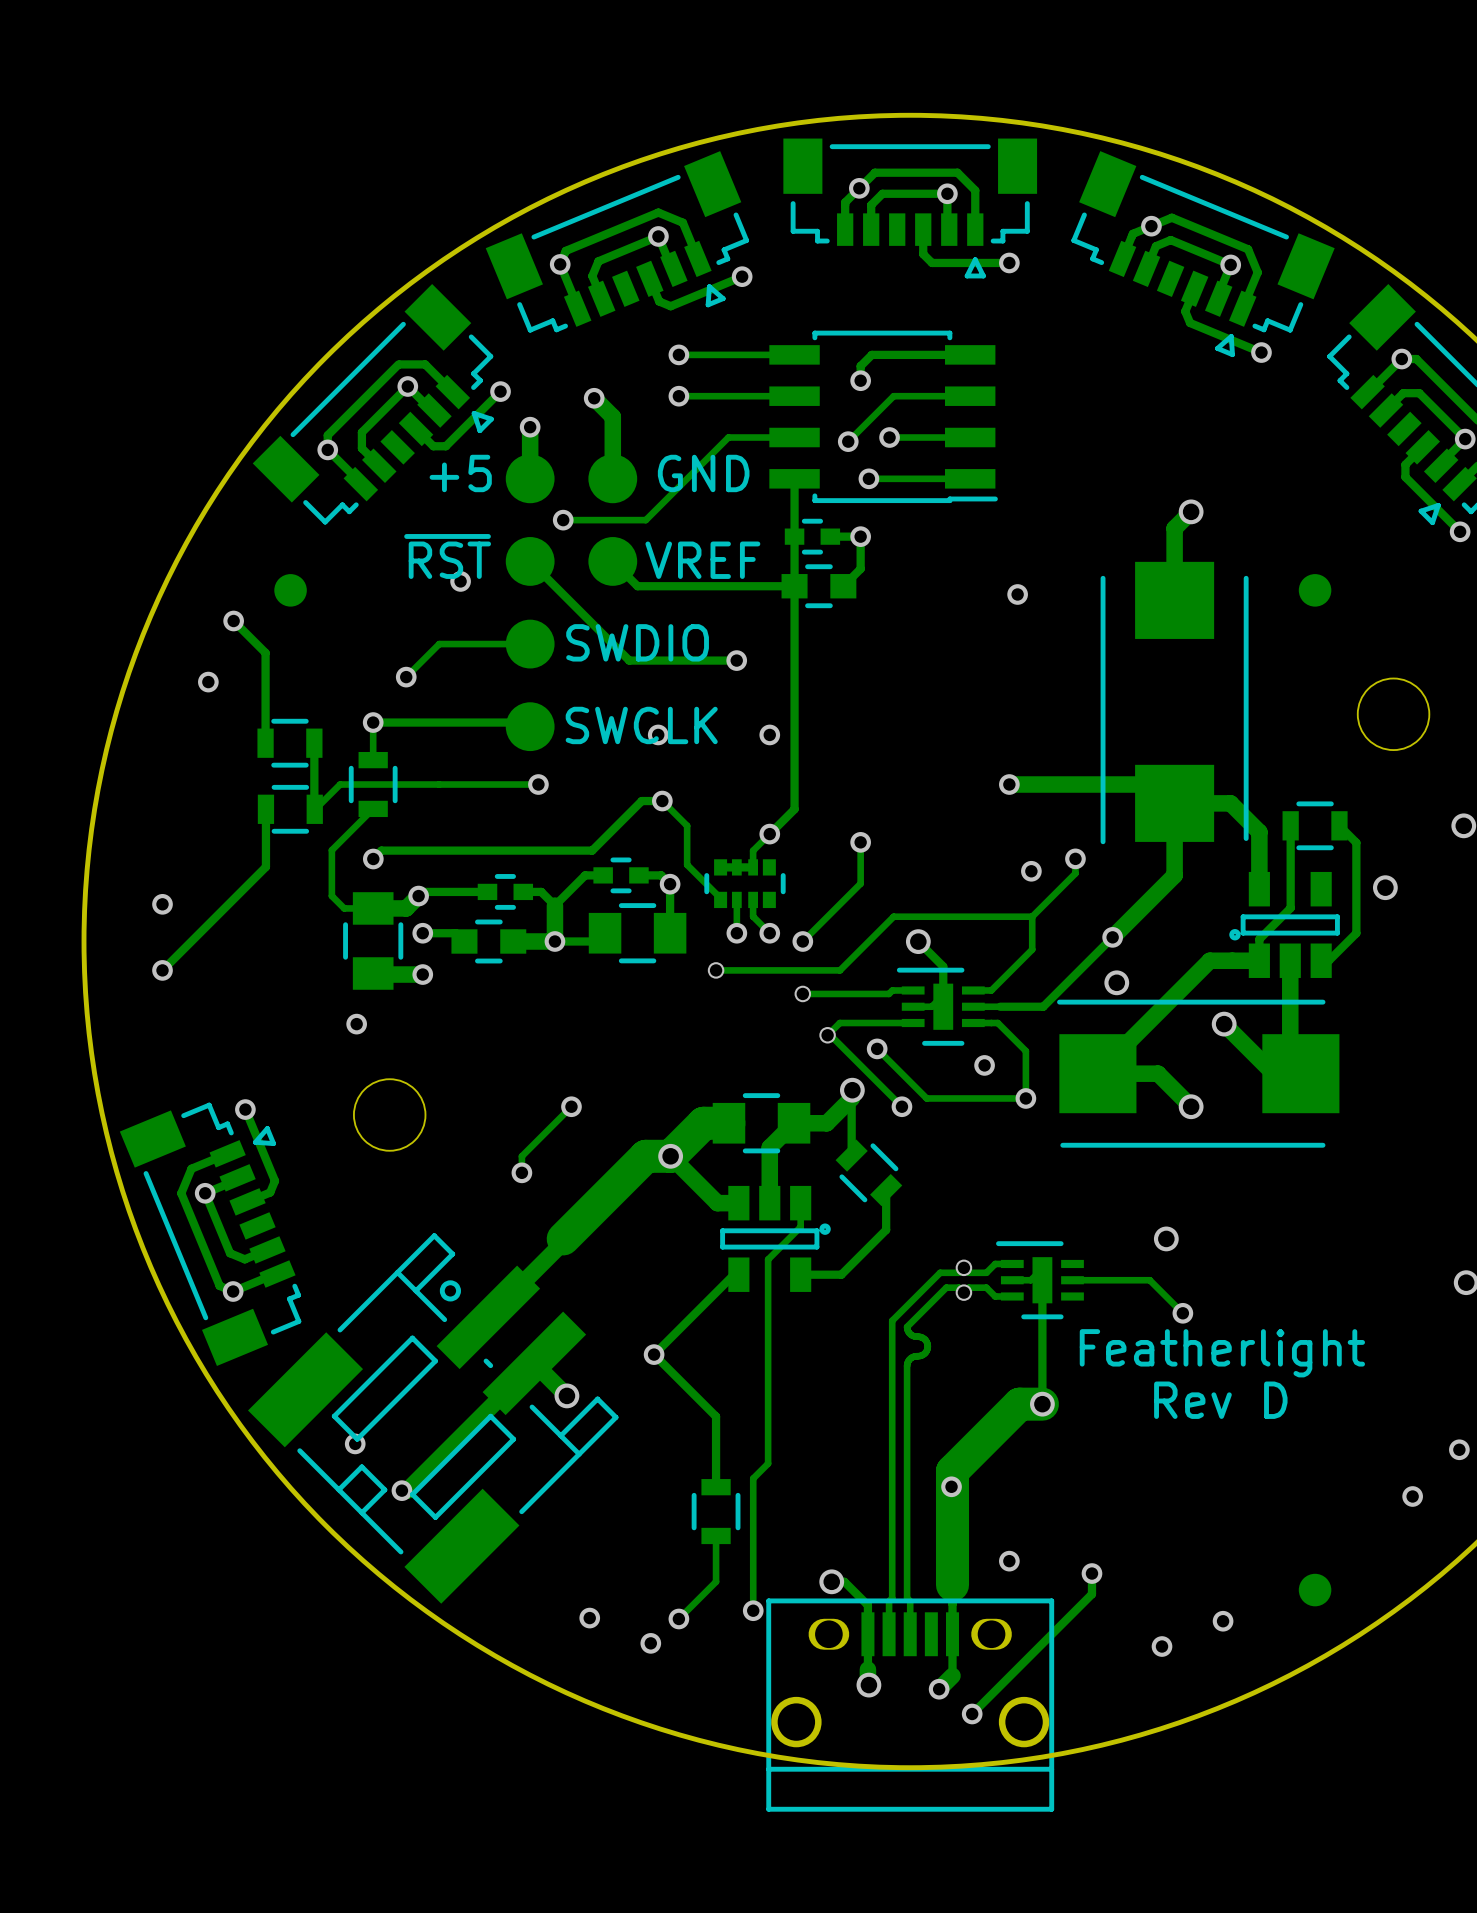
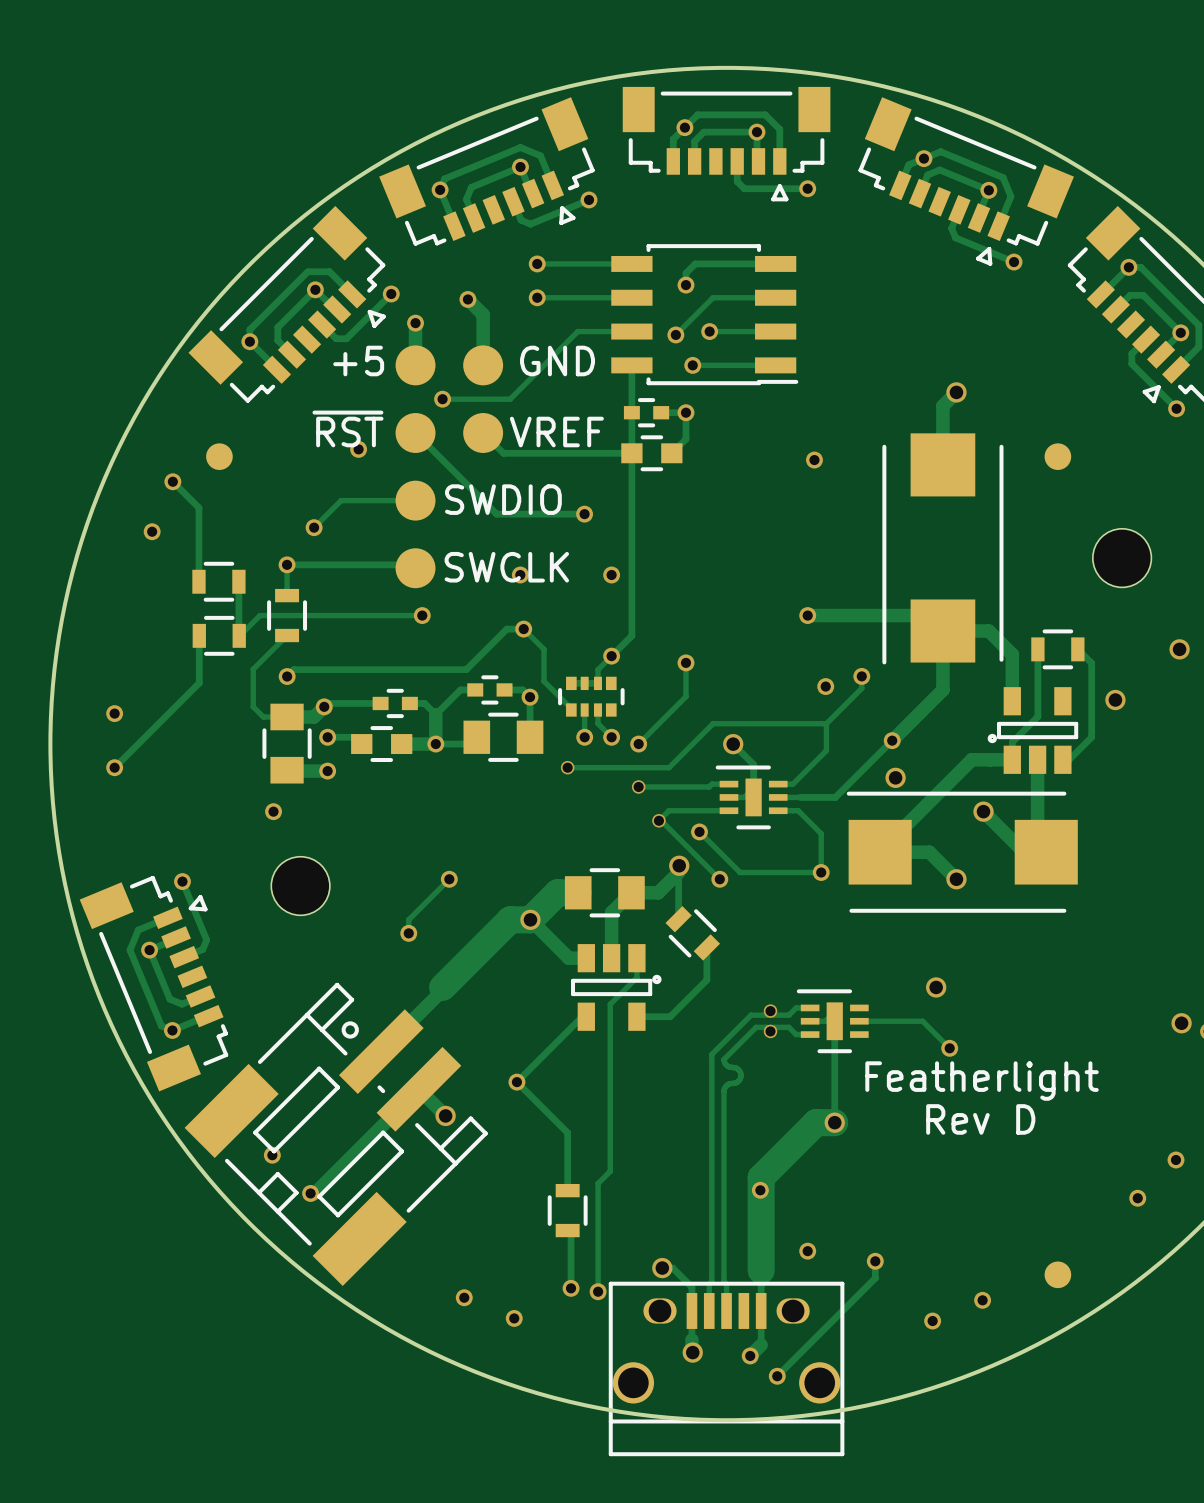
via: (984, 1065) -> none
track: (716, 1535) (716, 1581) (678, 1618) -> (567, 1230) (571, 1233) (571, 1288)
via position: (678, 1618) -> (571, 1288)

